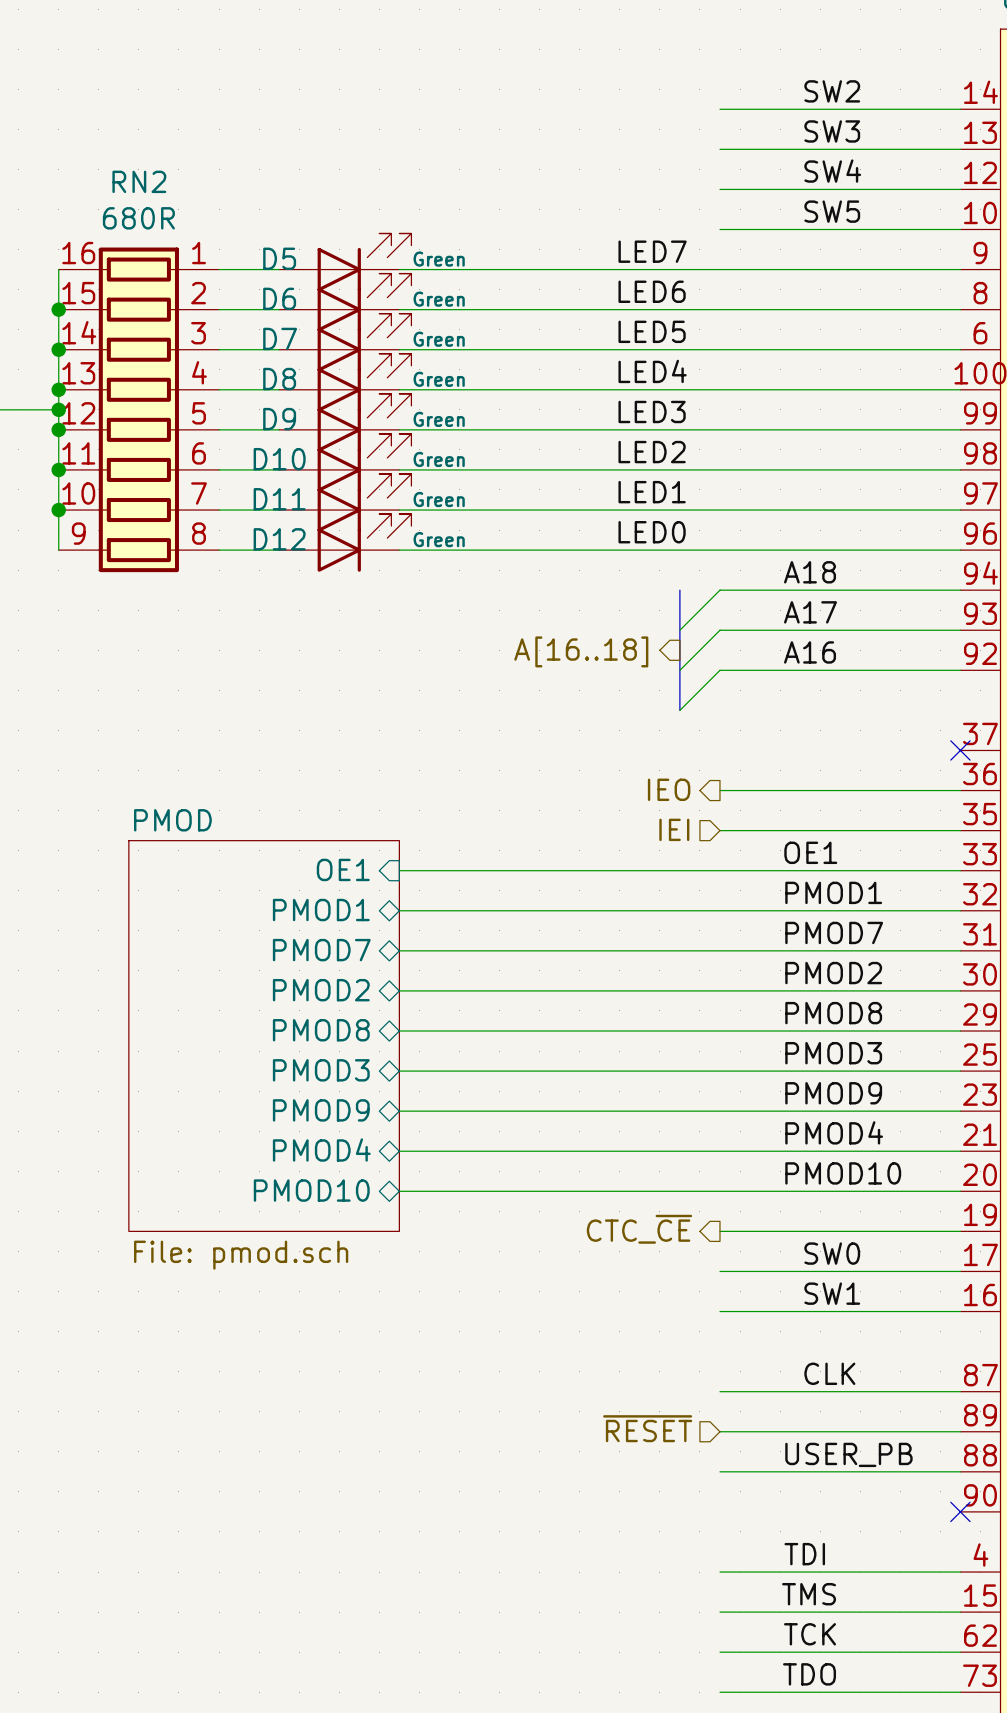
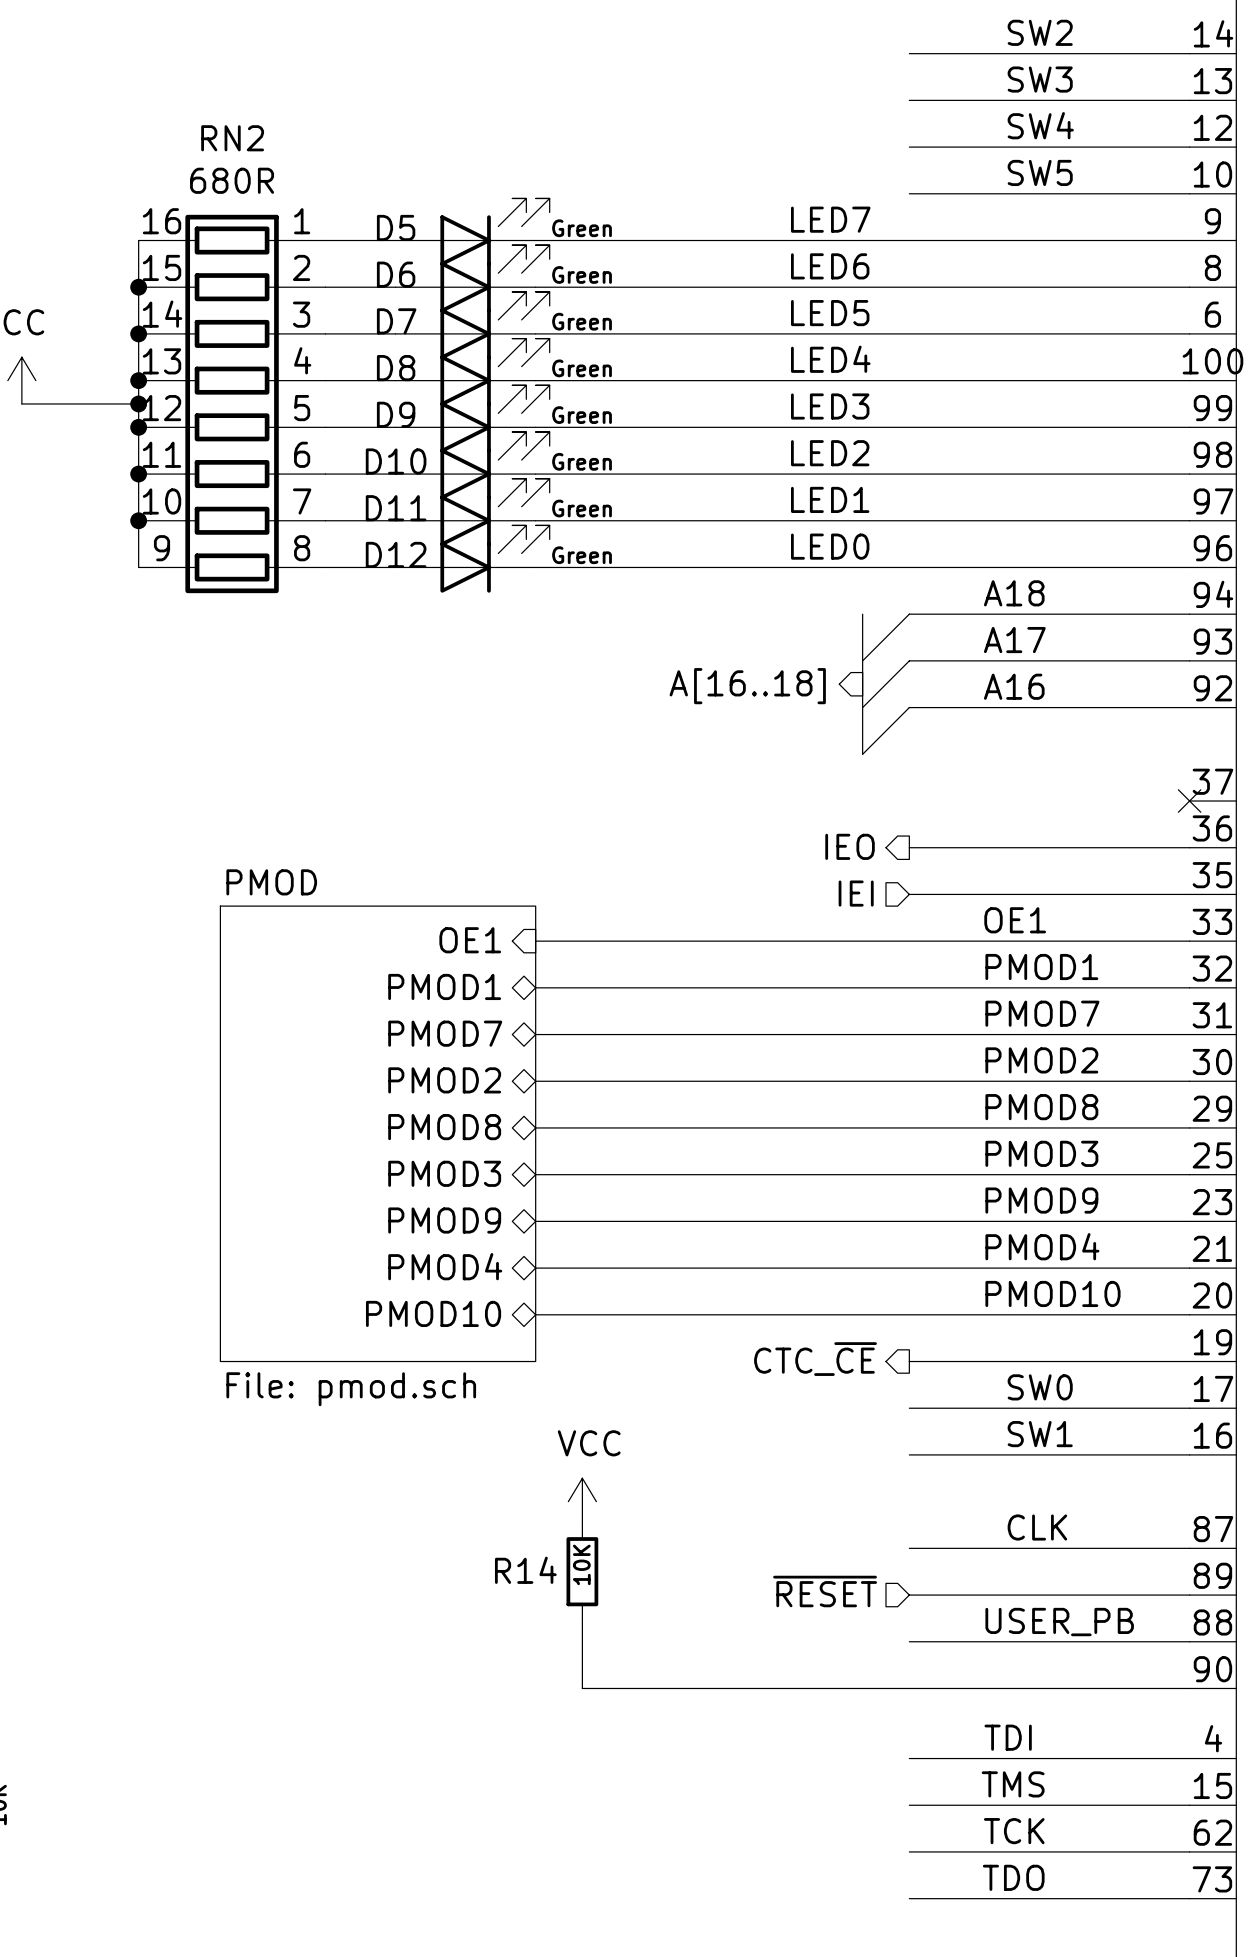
power symbol: none -> VCC (582, 1501)
R14: none -> 10K (582, 1571)
wire: none -> (582, 1618) (582, 1688) (1189, 1688)
no-connect mark: (960, 1511) -> none

